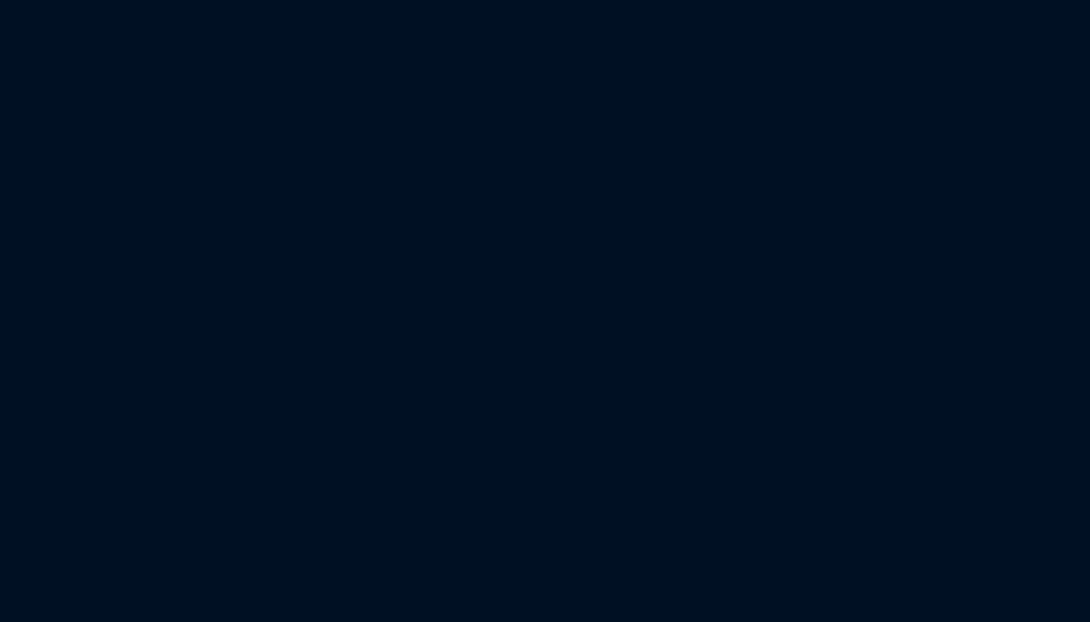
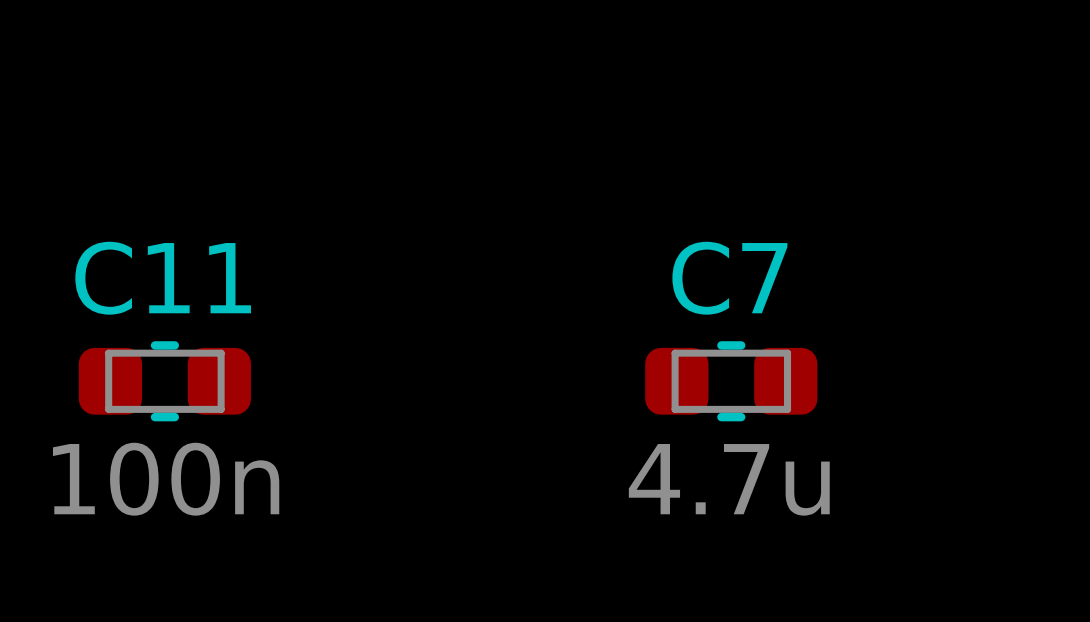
C11: none -> 100n (164, 381)
C7: none -> 4.7u (731, 381)

